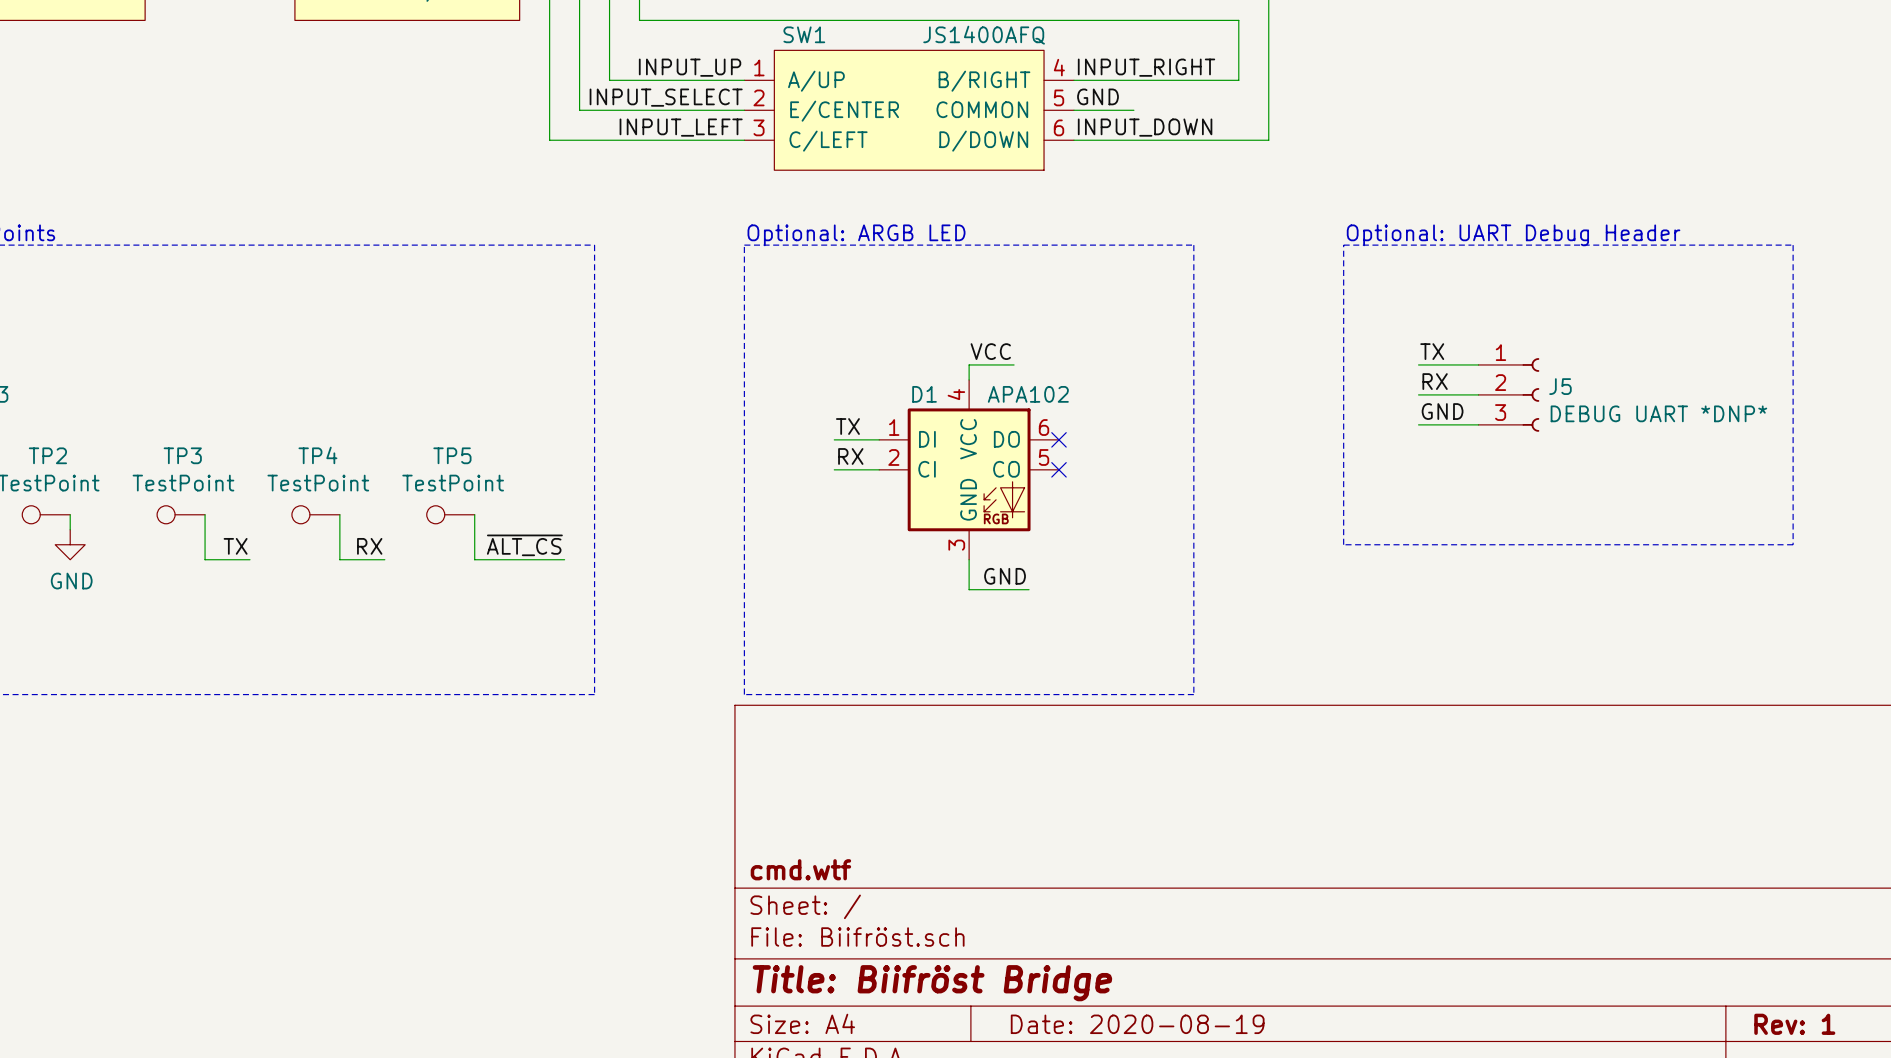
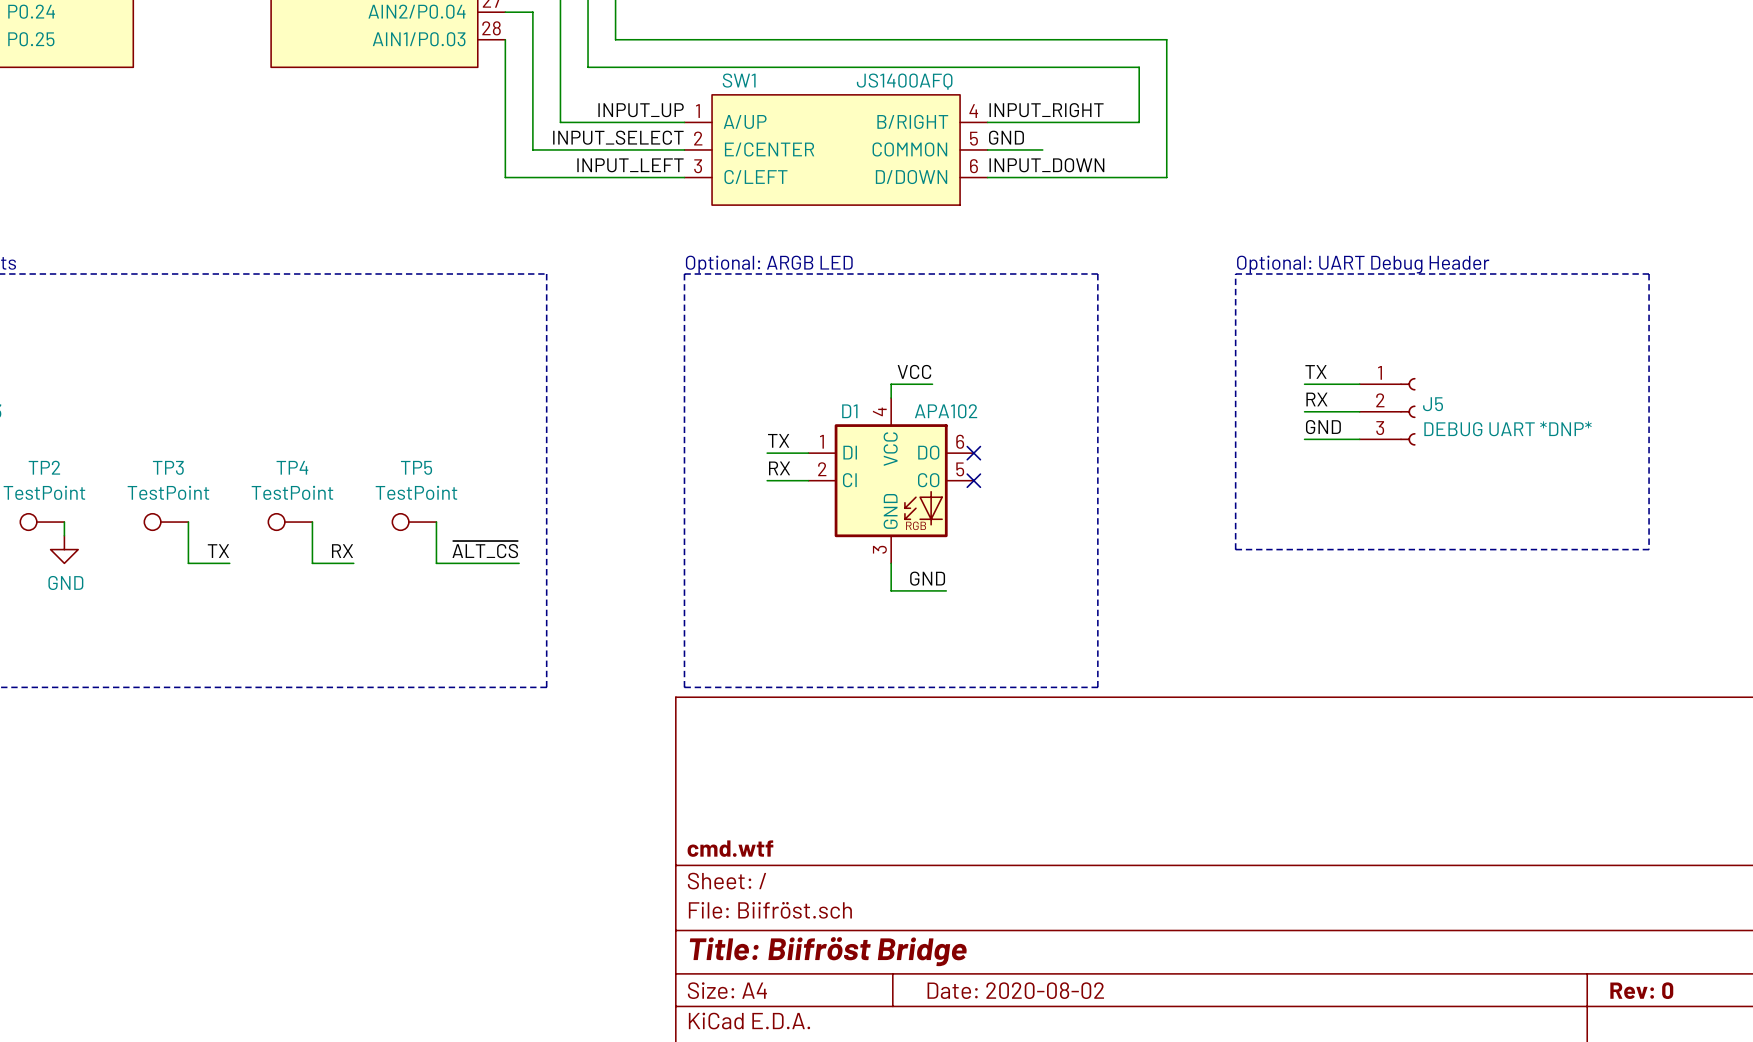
title block: Date: 2020-08-19 (1137, 1024) -> Date: 2020-08-02 (1015, 990)
title block: Rev: 1 (1794, 1024) -> Rev: 0 (1641, 990)

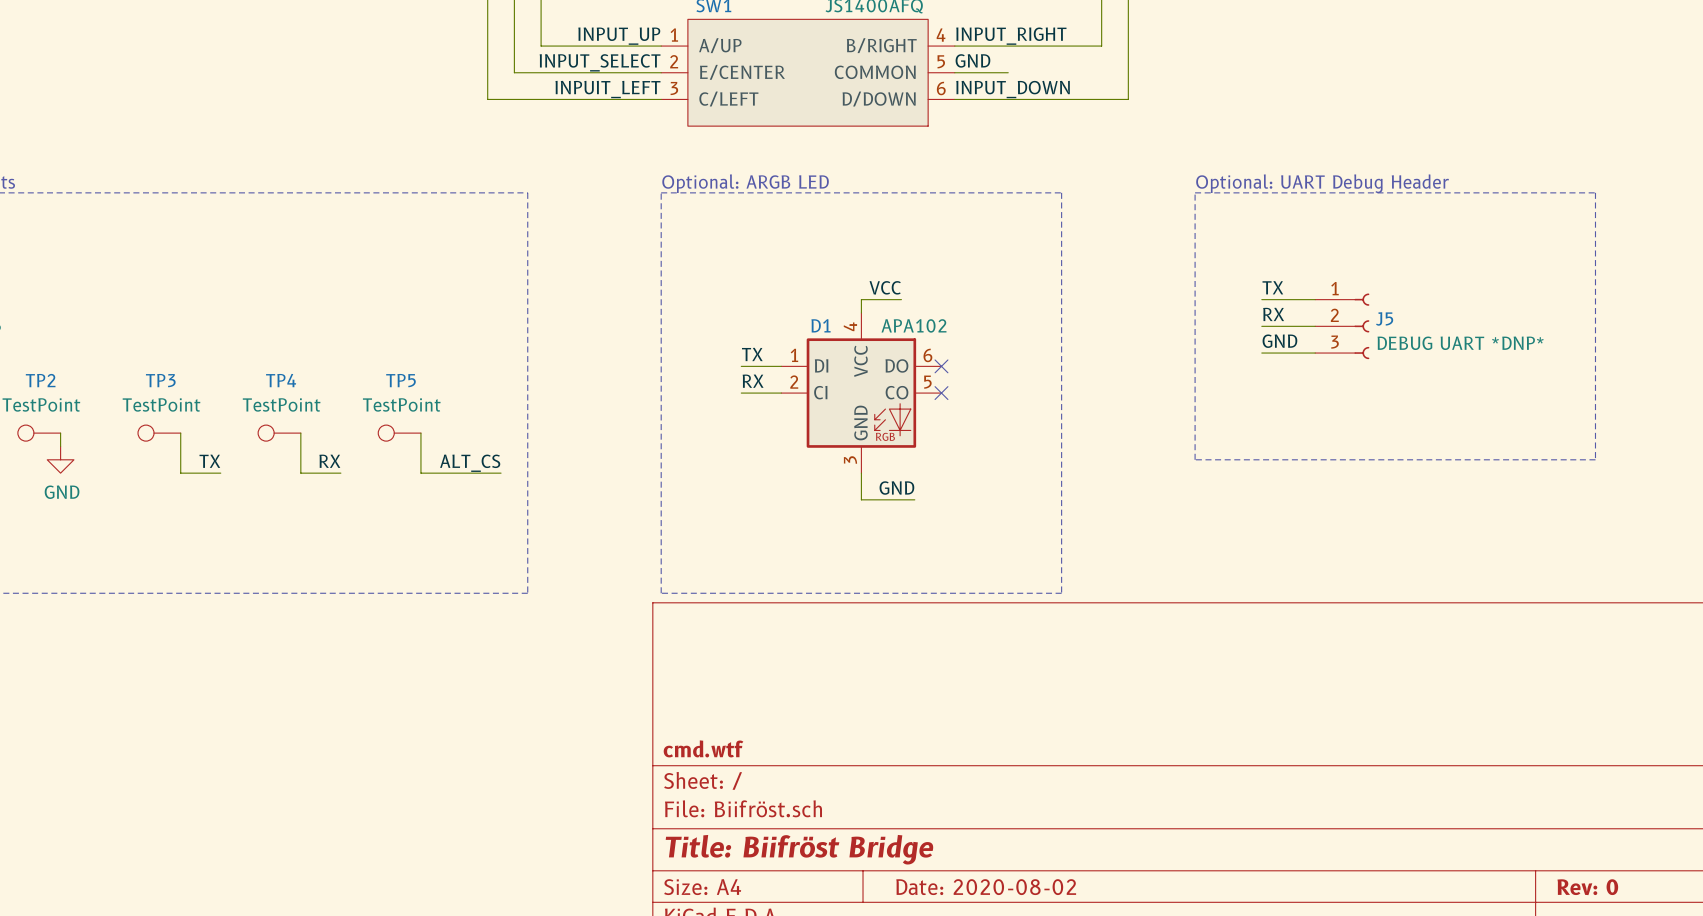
label: INPUT_LEFT (630, 165) -> INPUIT_LEFT (607, 89)
label: ~{ALT_CS} (485, 549) -> ALT_CS (470, 463)

